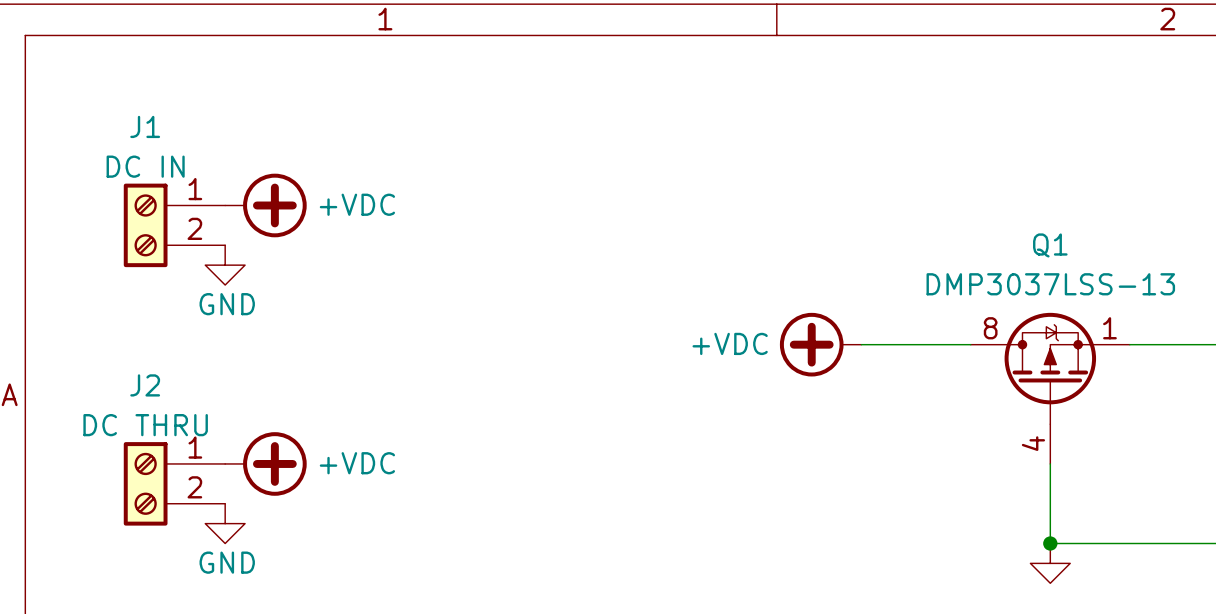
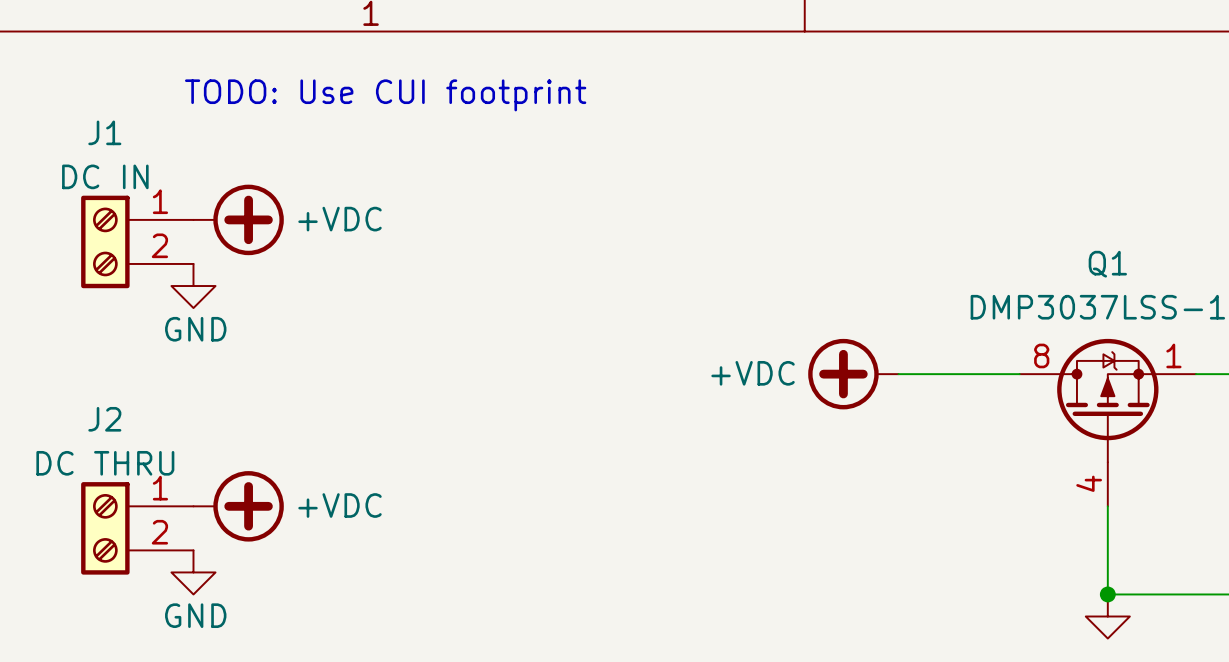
text: none -> TODO: Use CUI footprint (385, 95)

